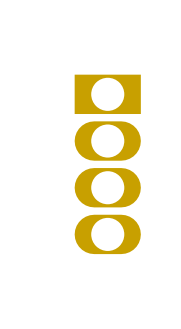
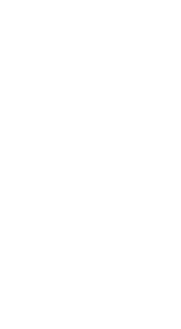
part: (107, 164) -> none

